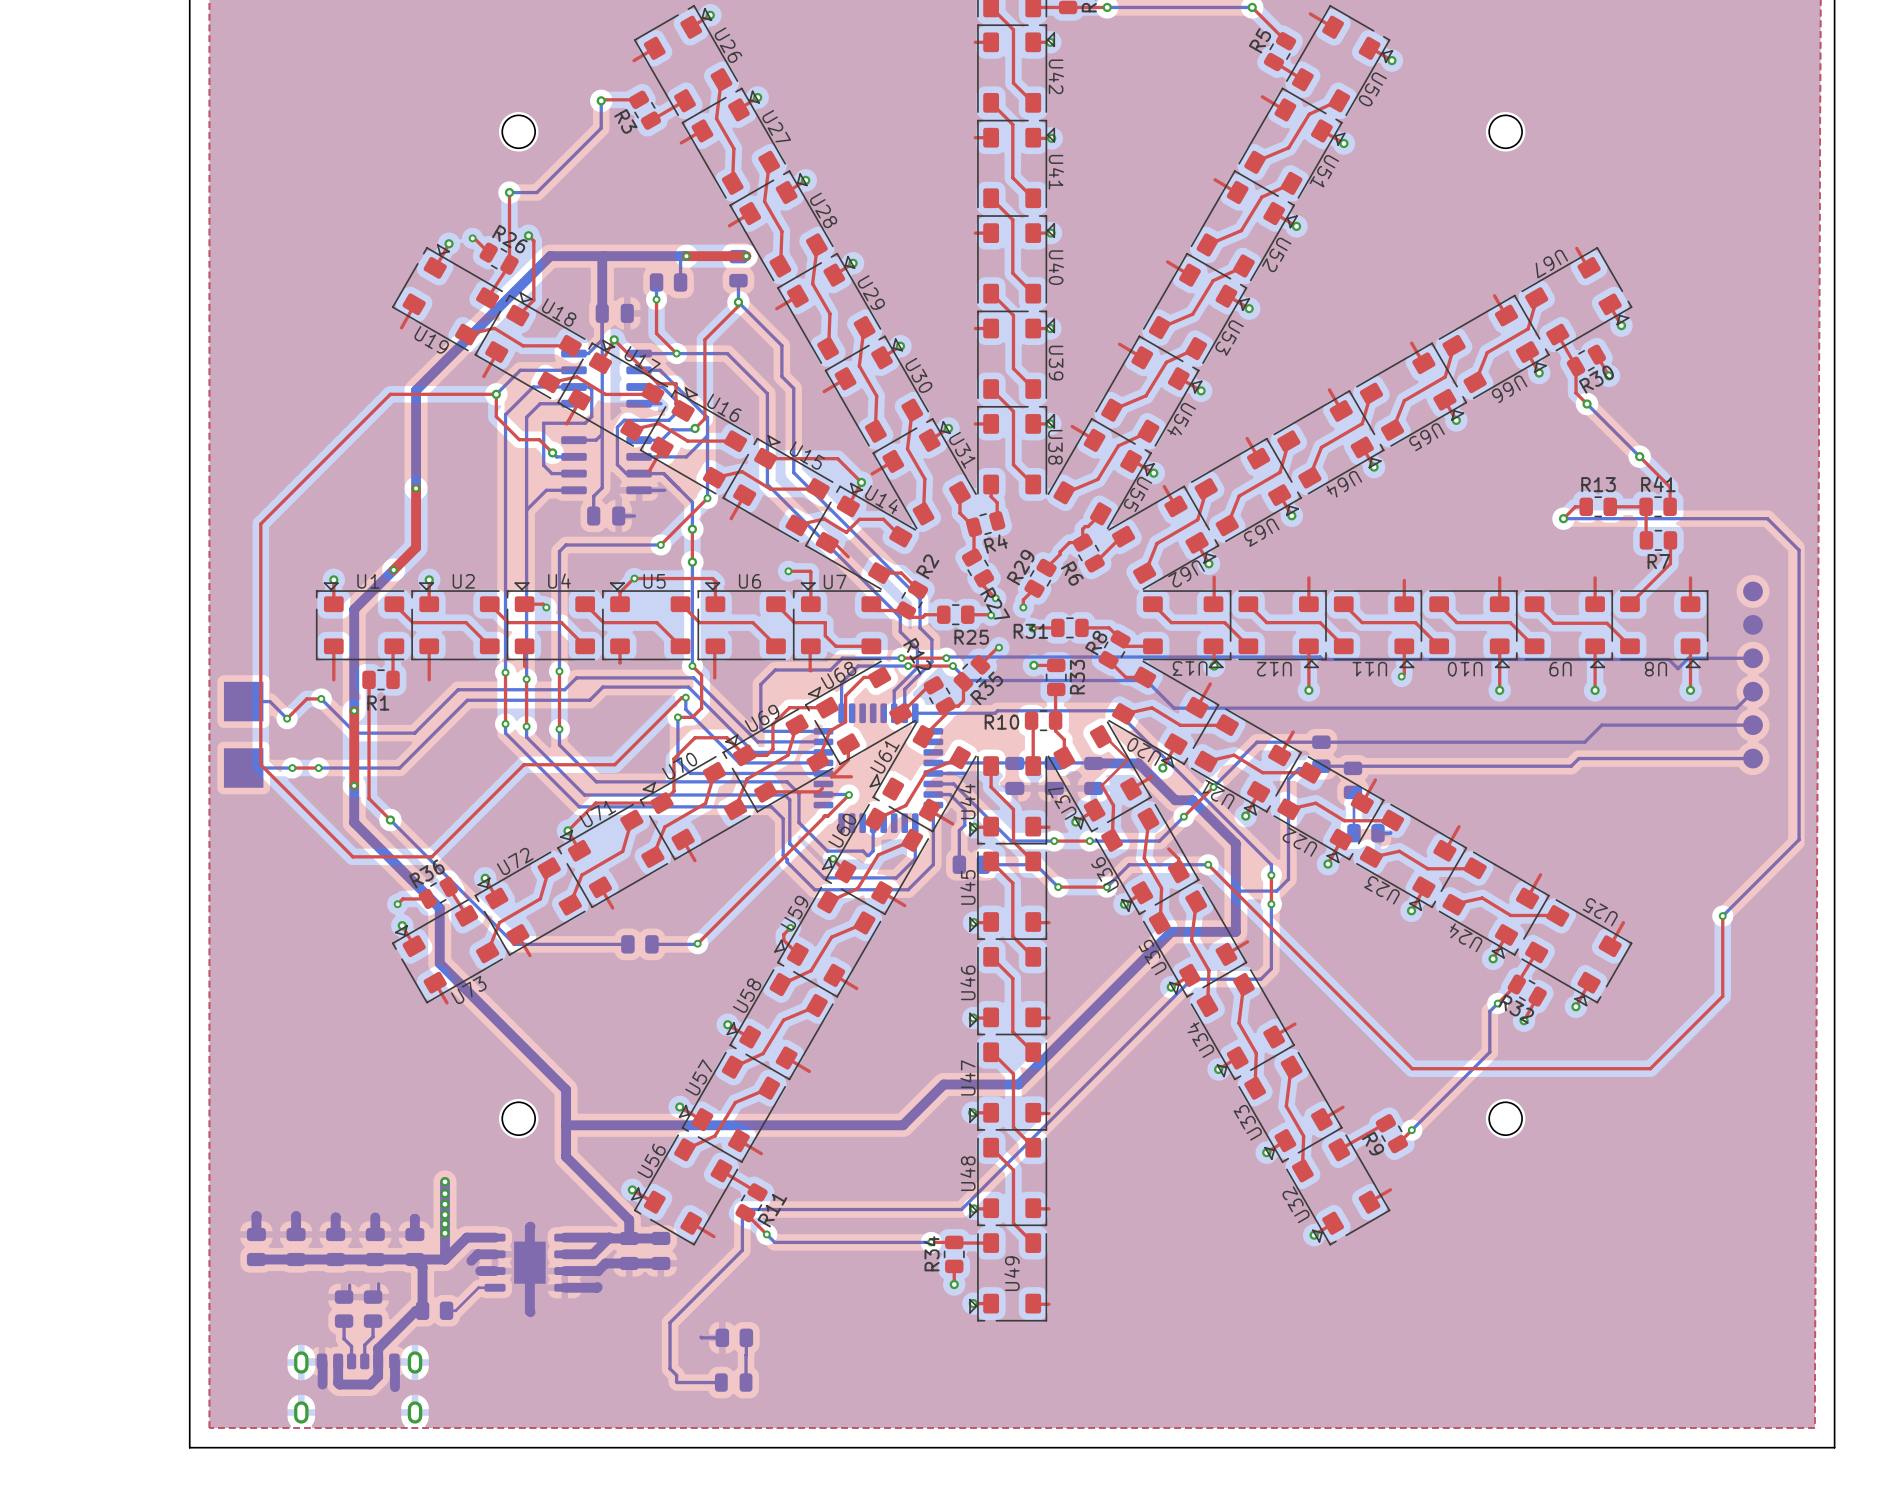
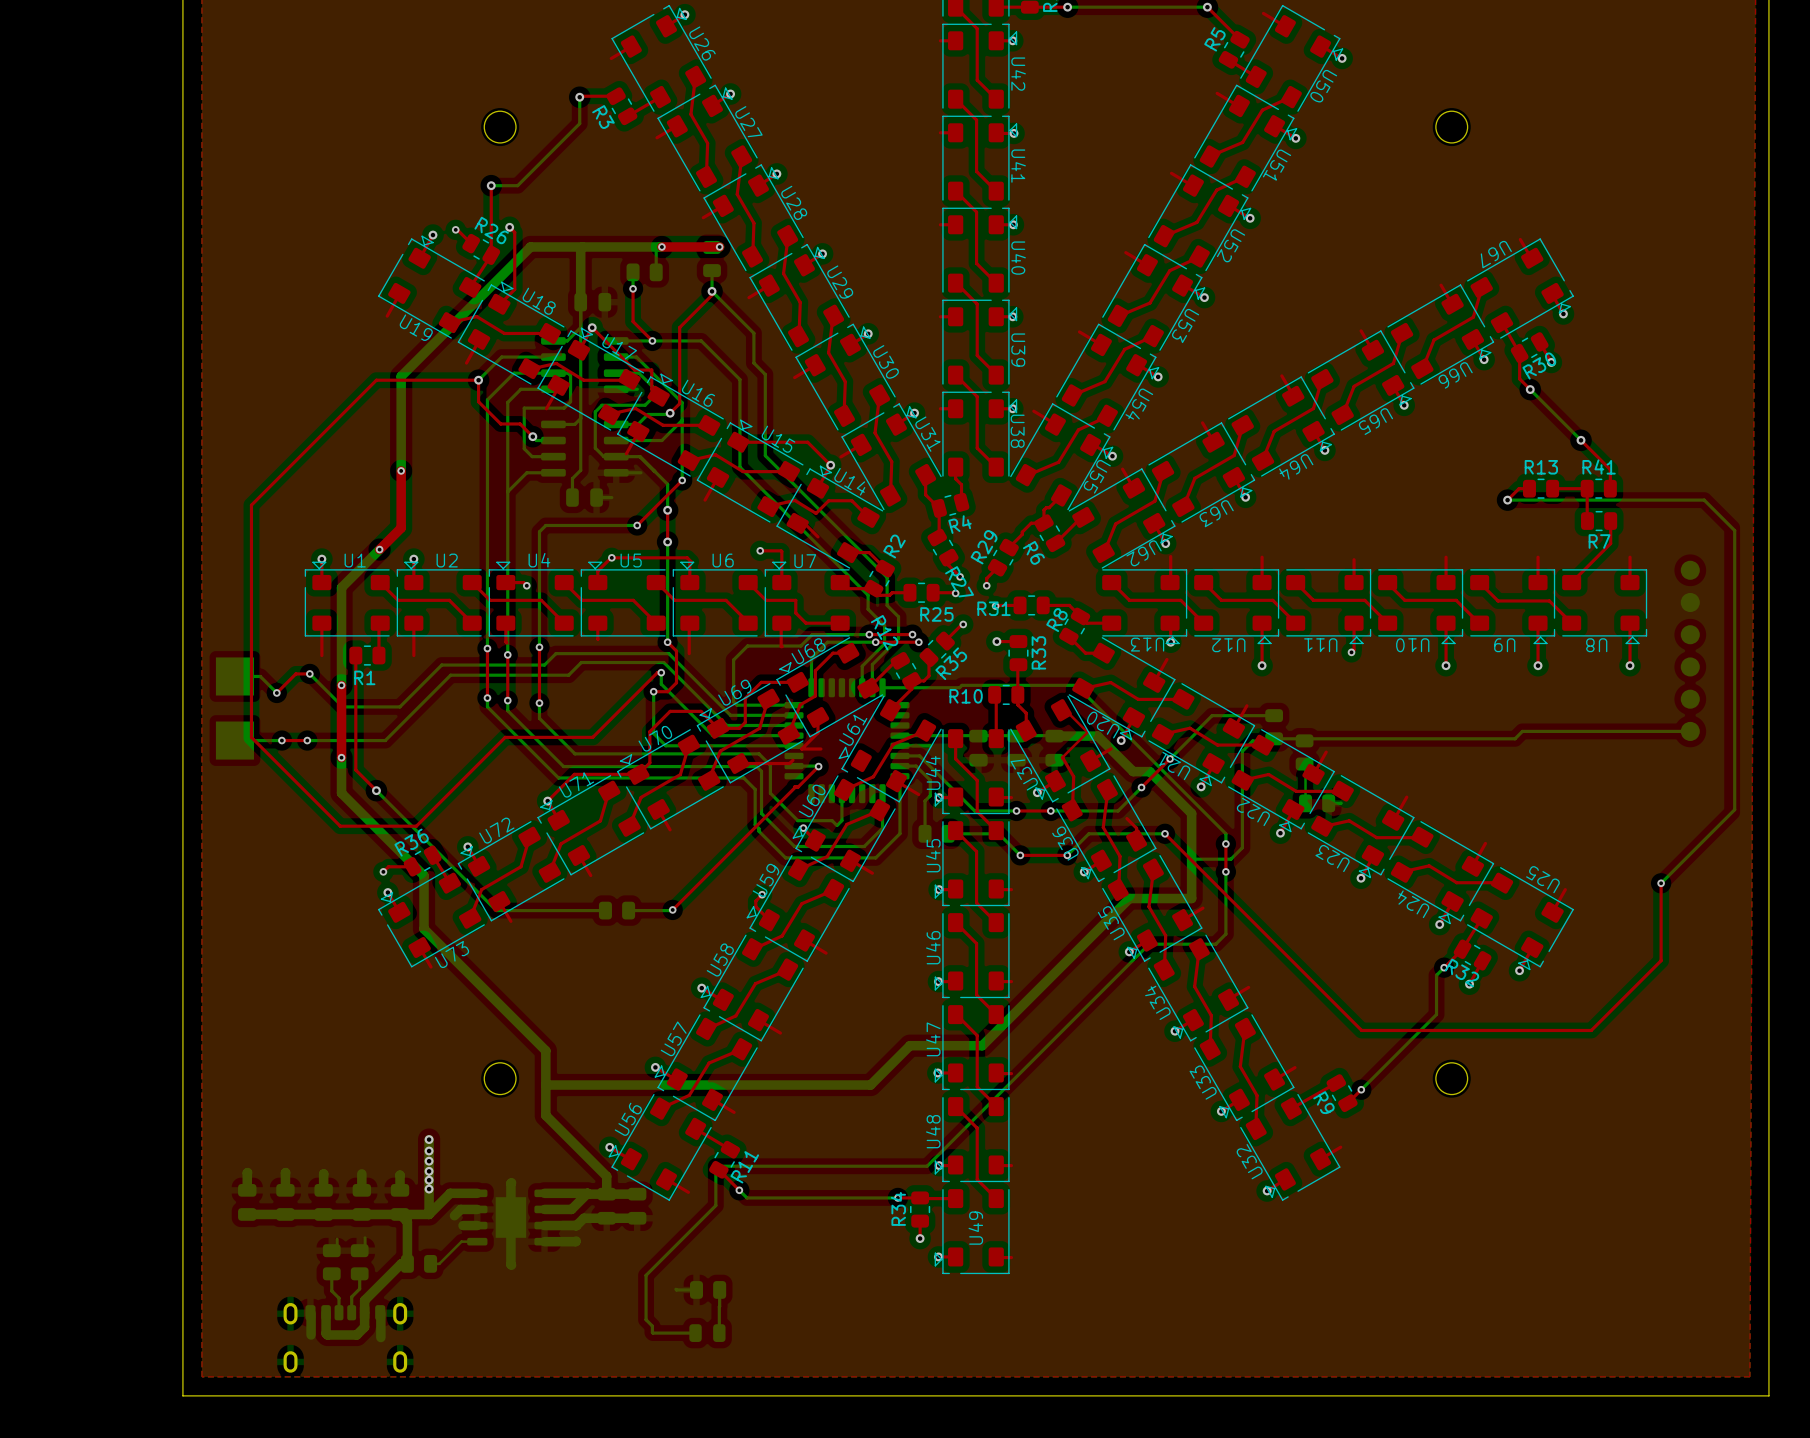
bottom track: (946, 658) (1320, 657) (1322, 659) (1668, 659) (1678, 668) (1688, 658) (1753, 658) -> none
bottom track: (952, 666) (967, 680) (1146, 680) (1174, 708) (1736, 708) (1753, 691) -> none
bottom track: (1753, 725) (1601, 725) (1584, 742) (1321, 742) -> none

